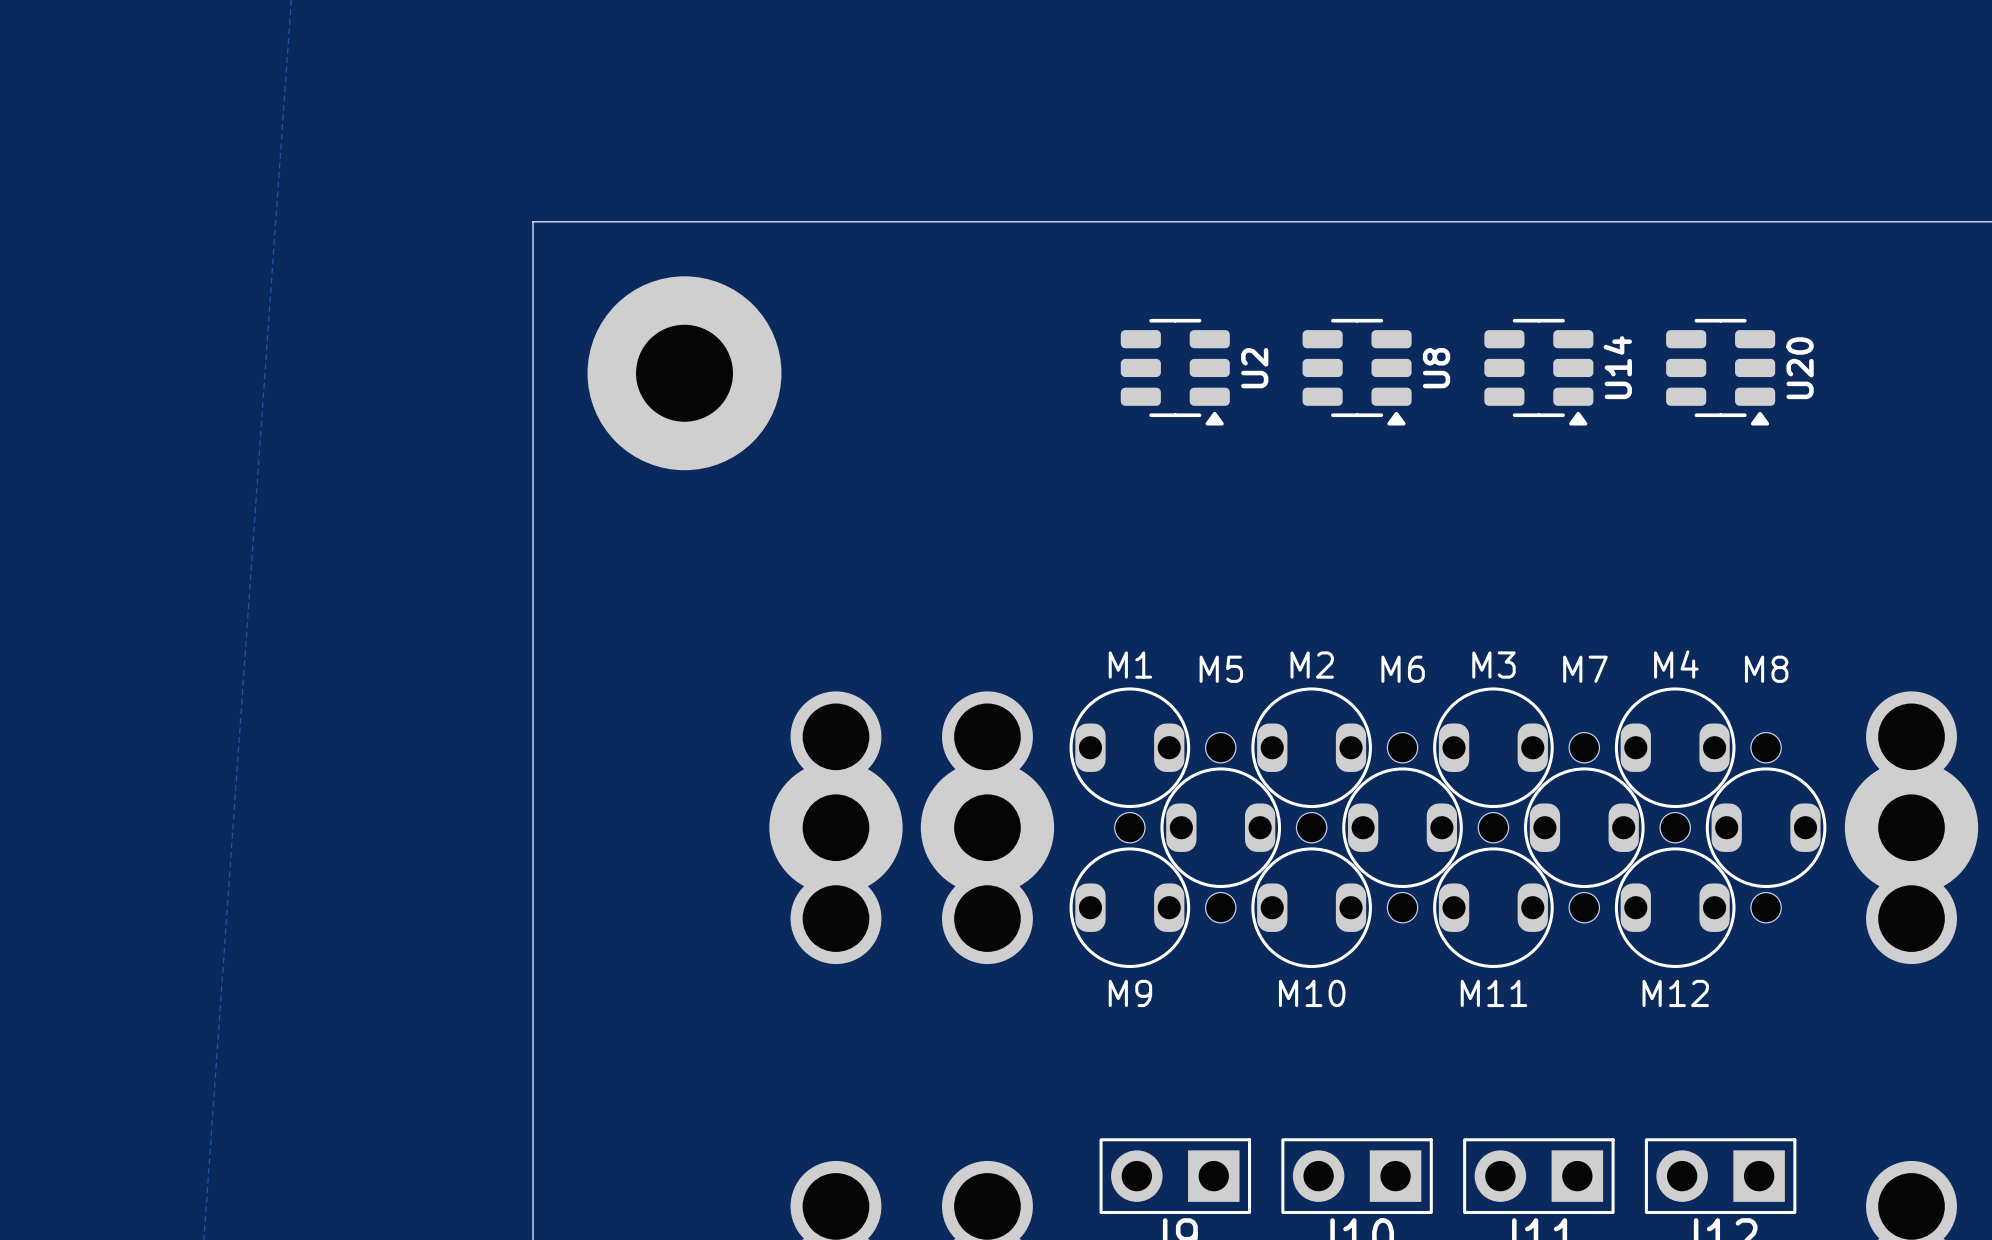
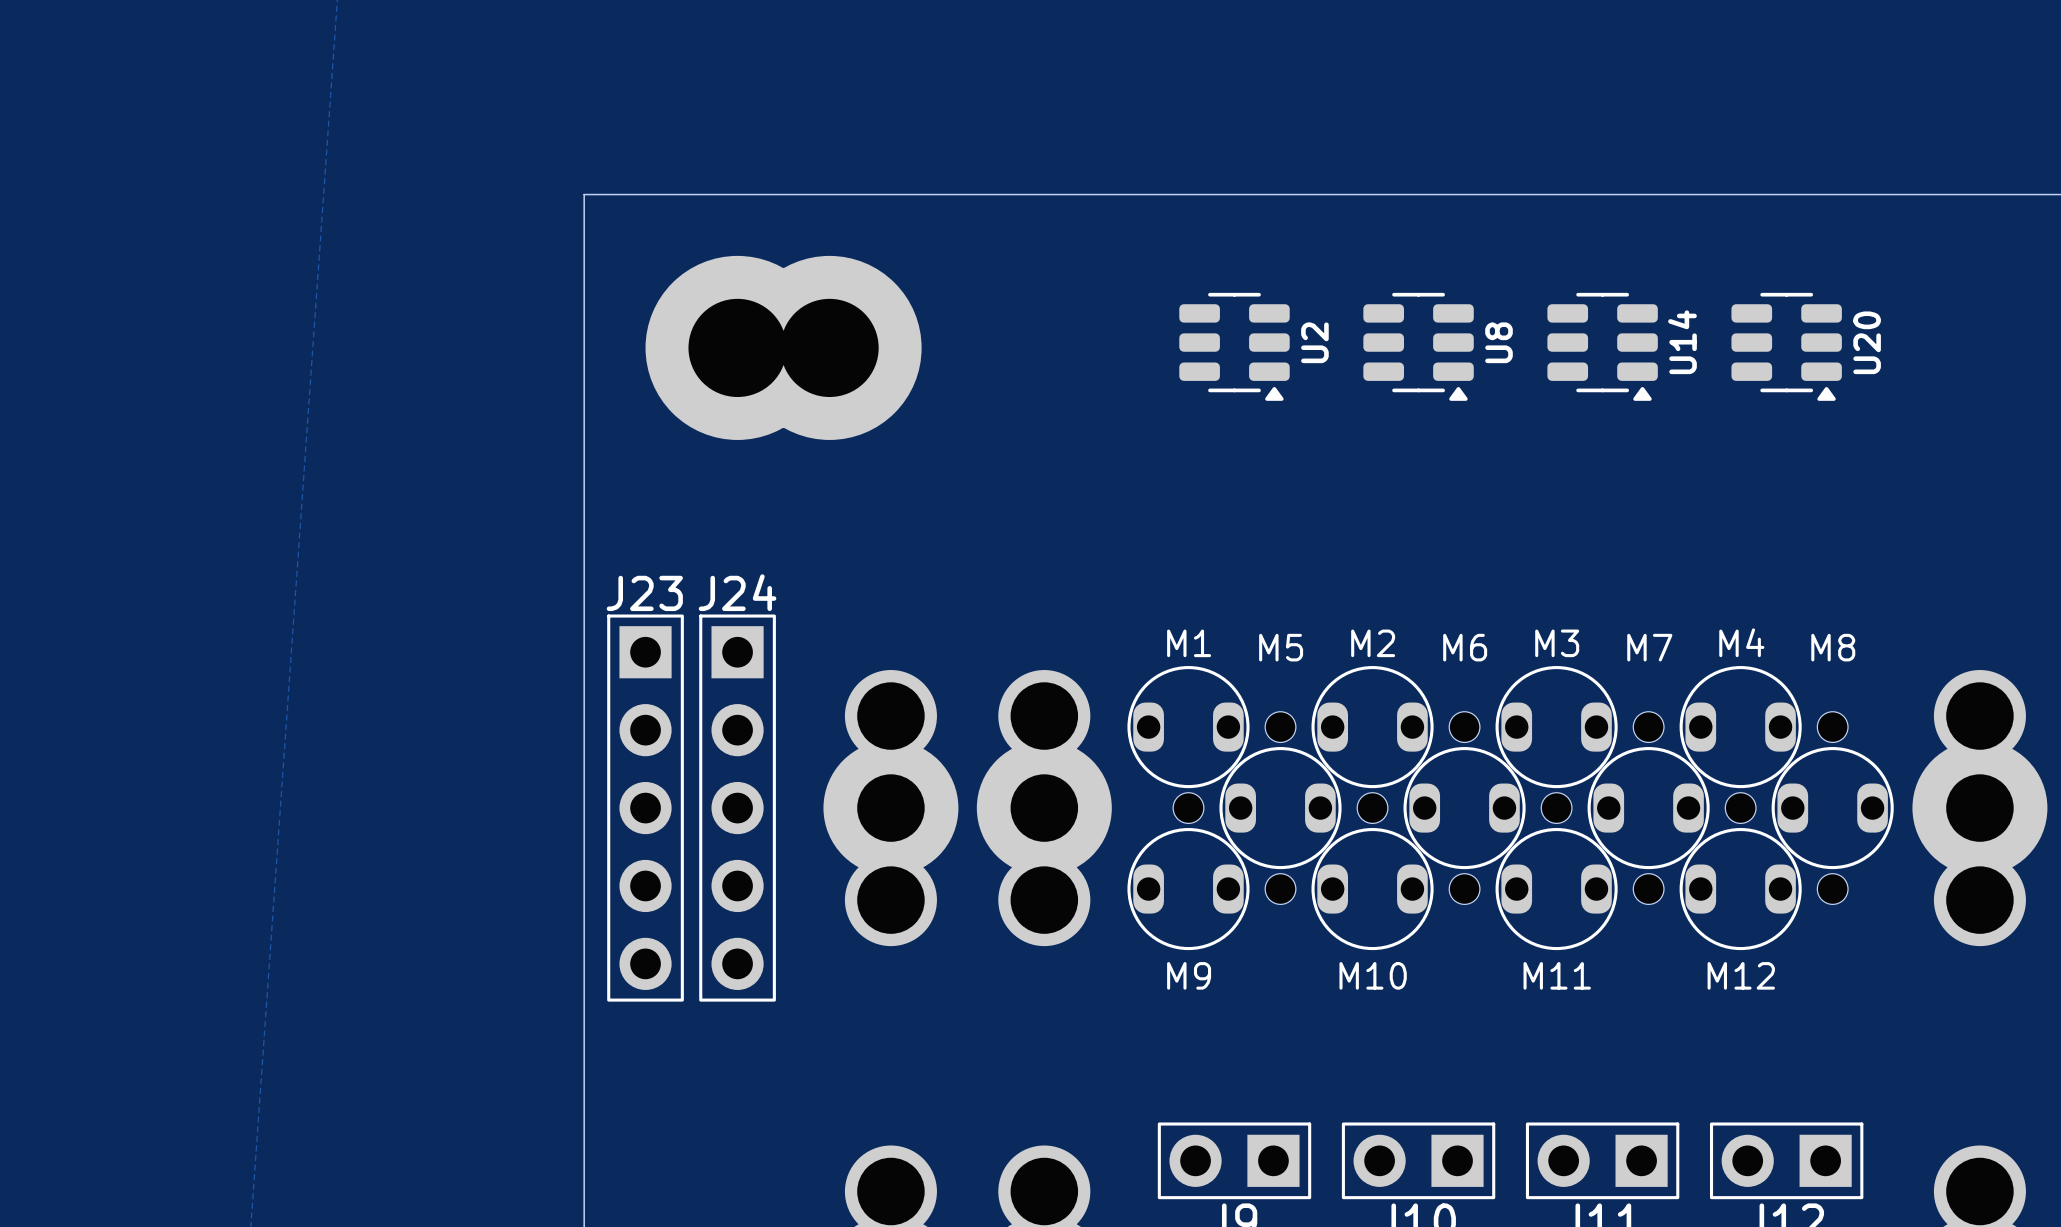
part: (684, 373) -> none
part: none -> (783, 347)
J23: none -> (645, 808)
J24: none -> (737, 808)

